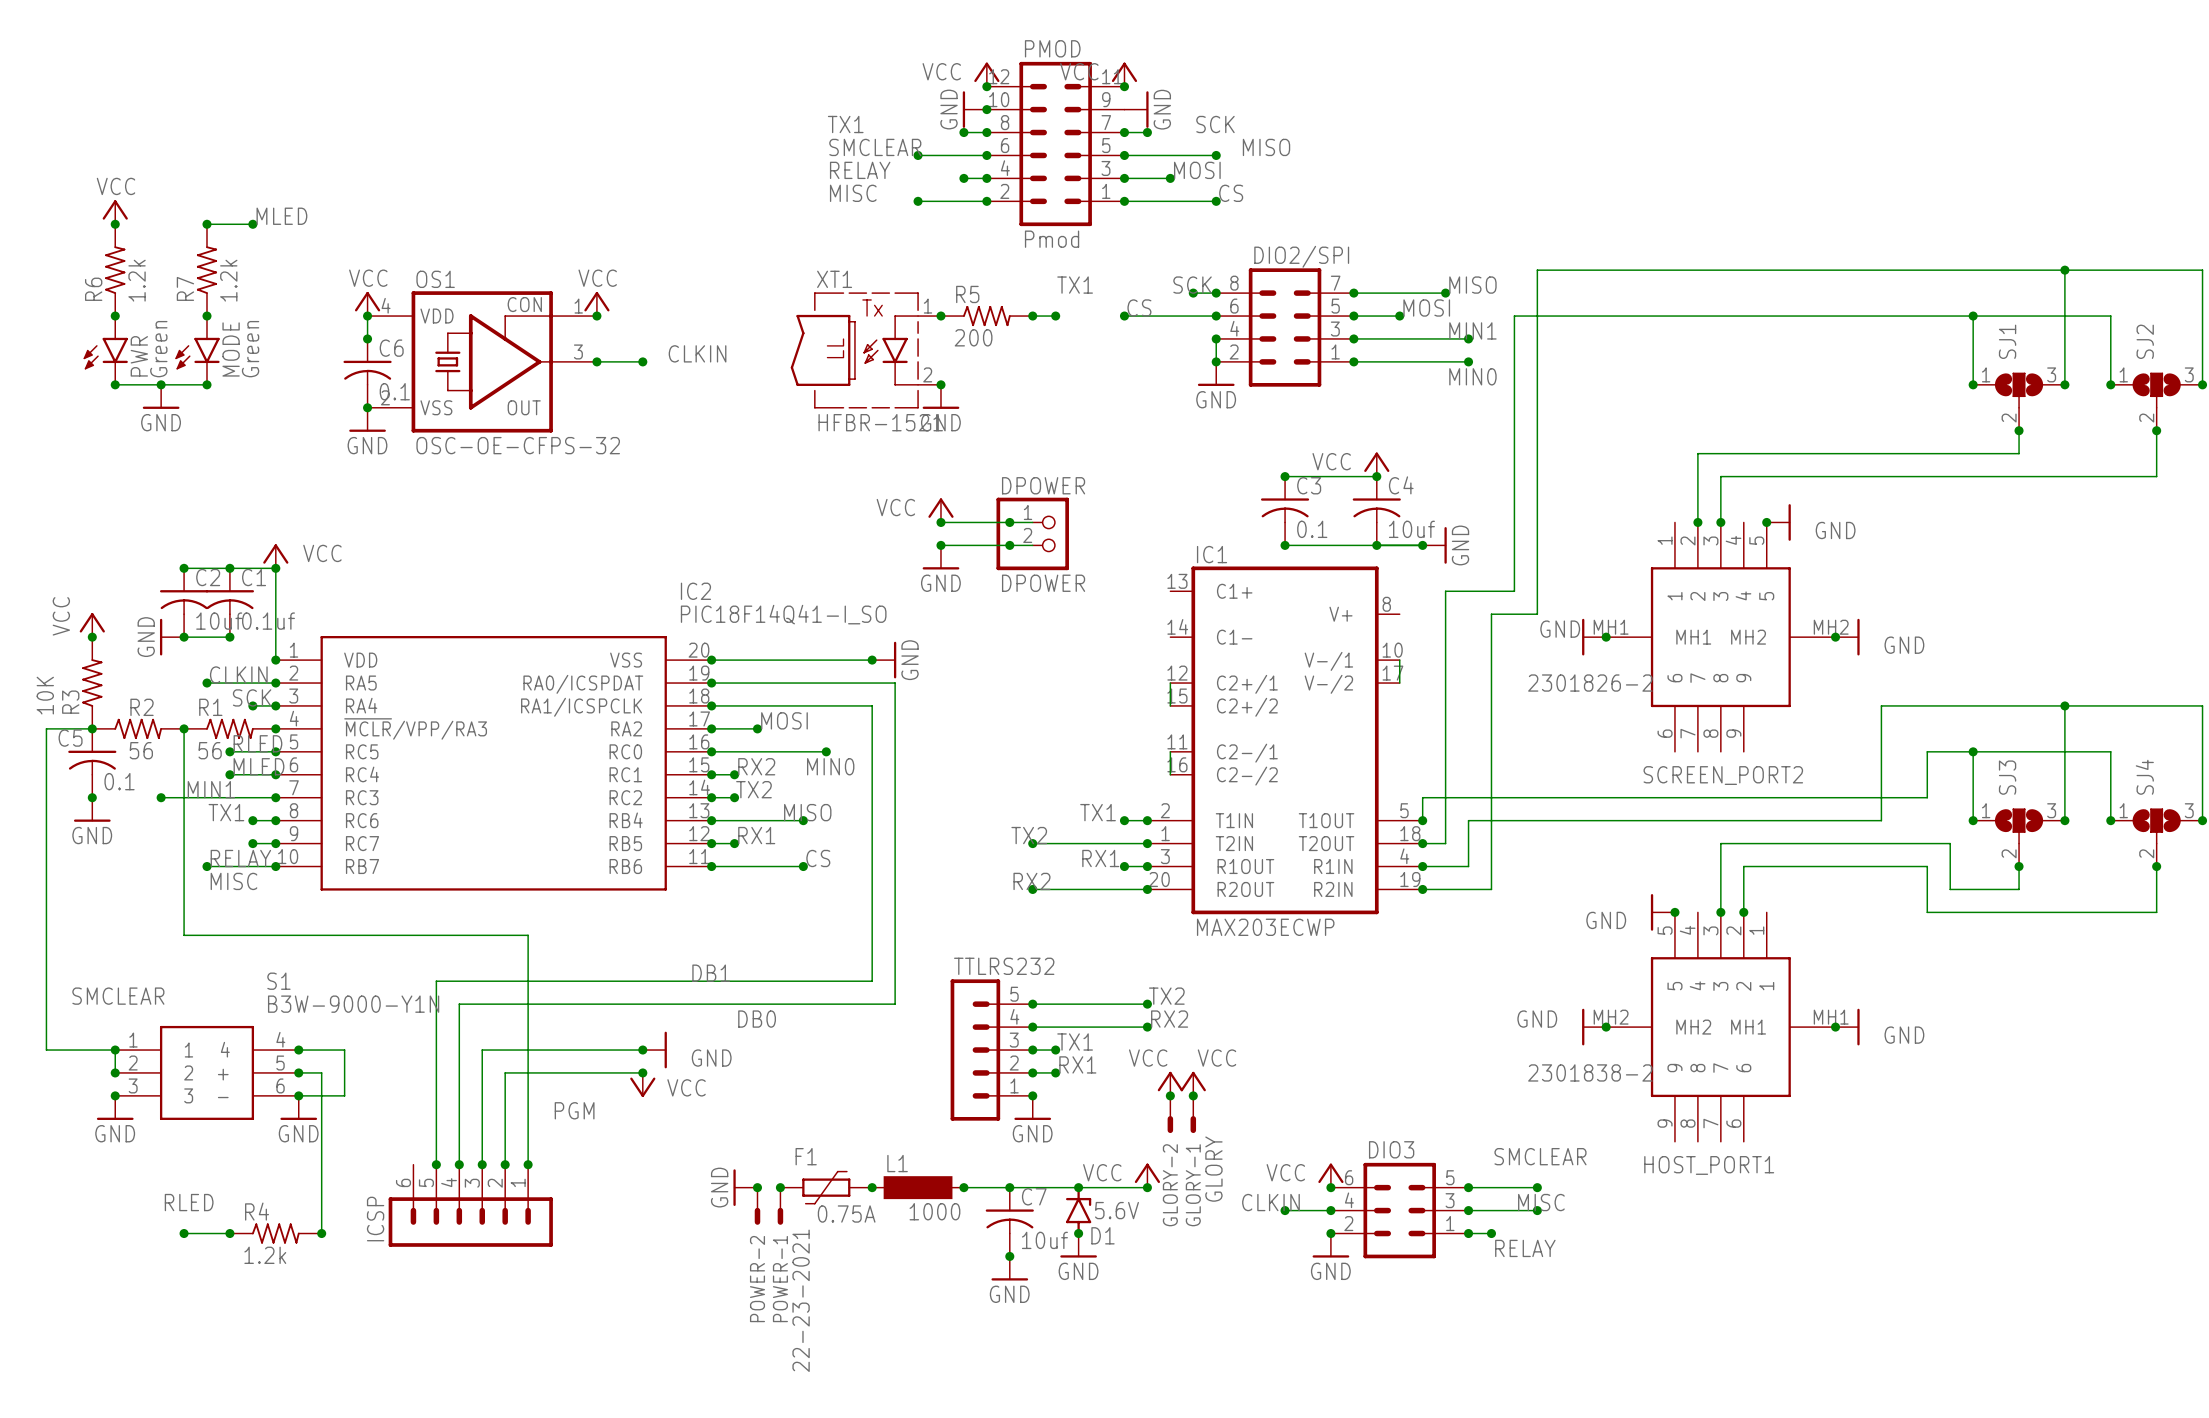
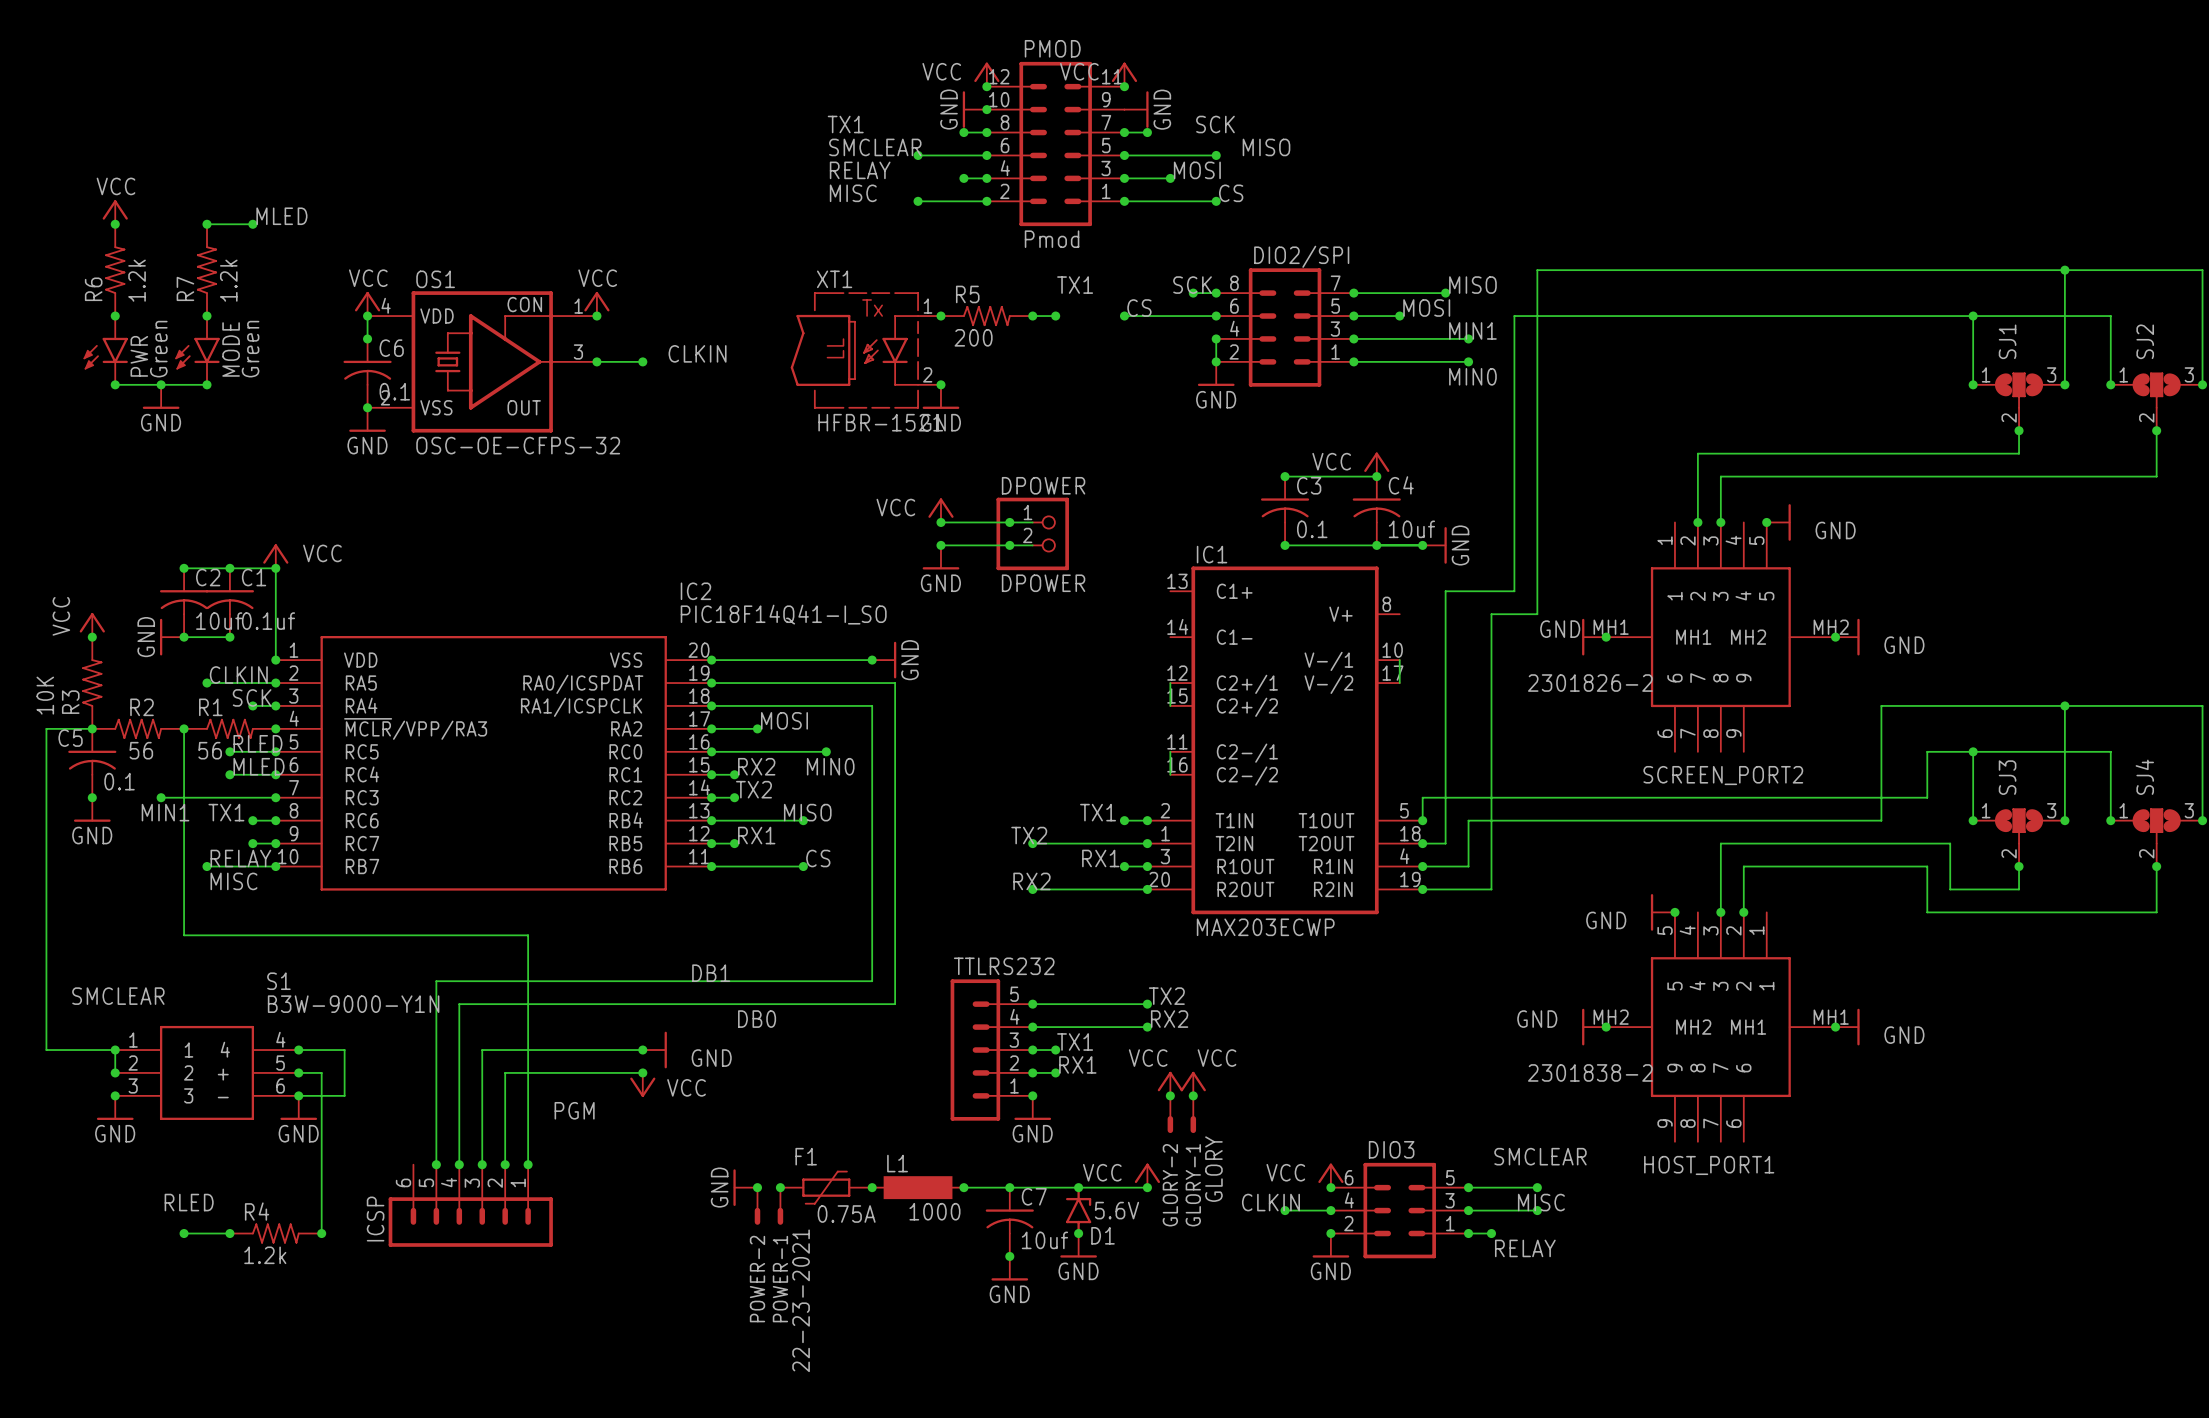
label position: MIN1 (211, 789) -> MIN1 (165, 812)

